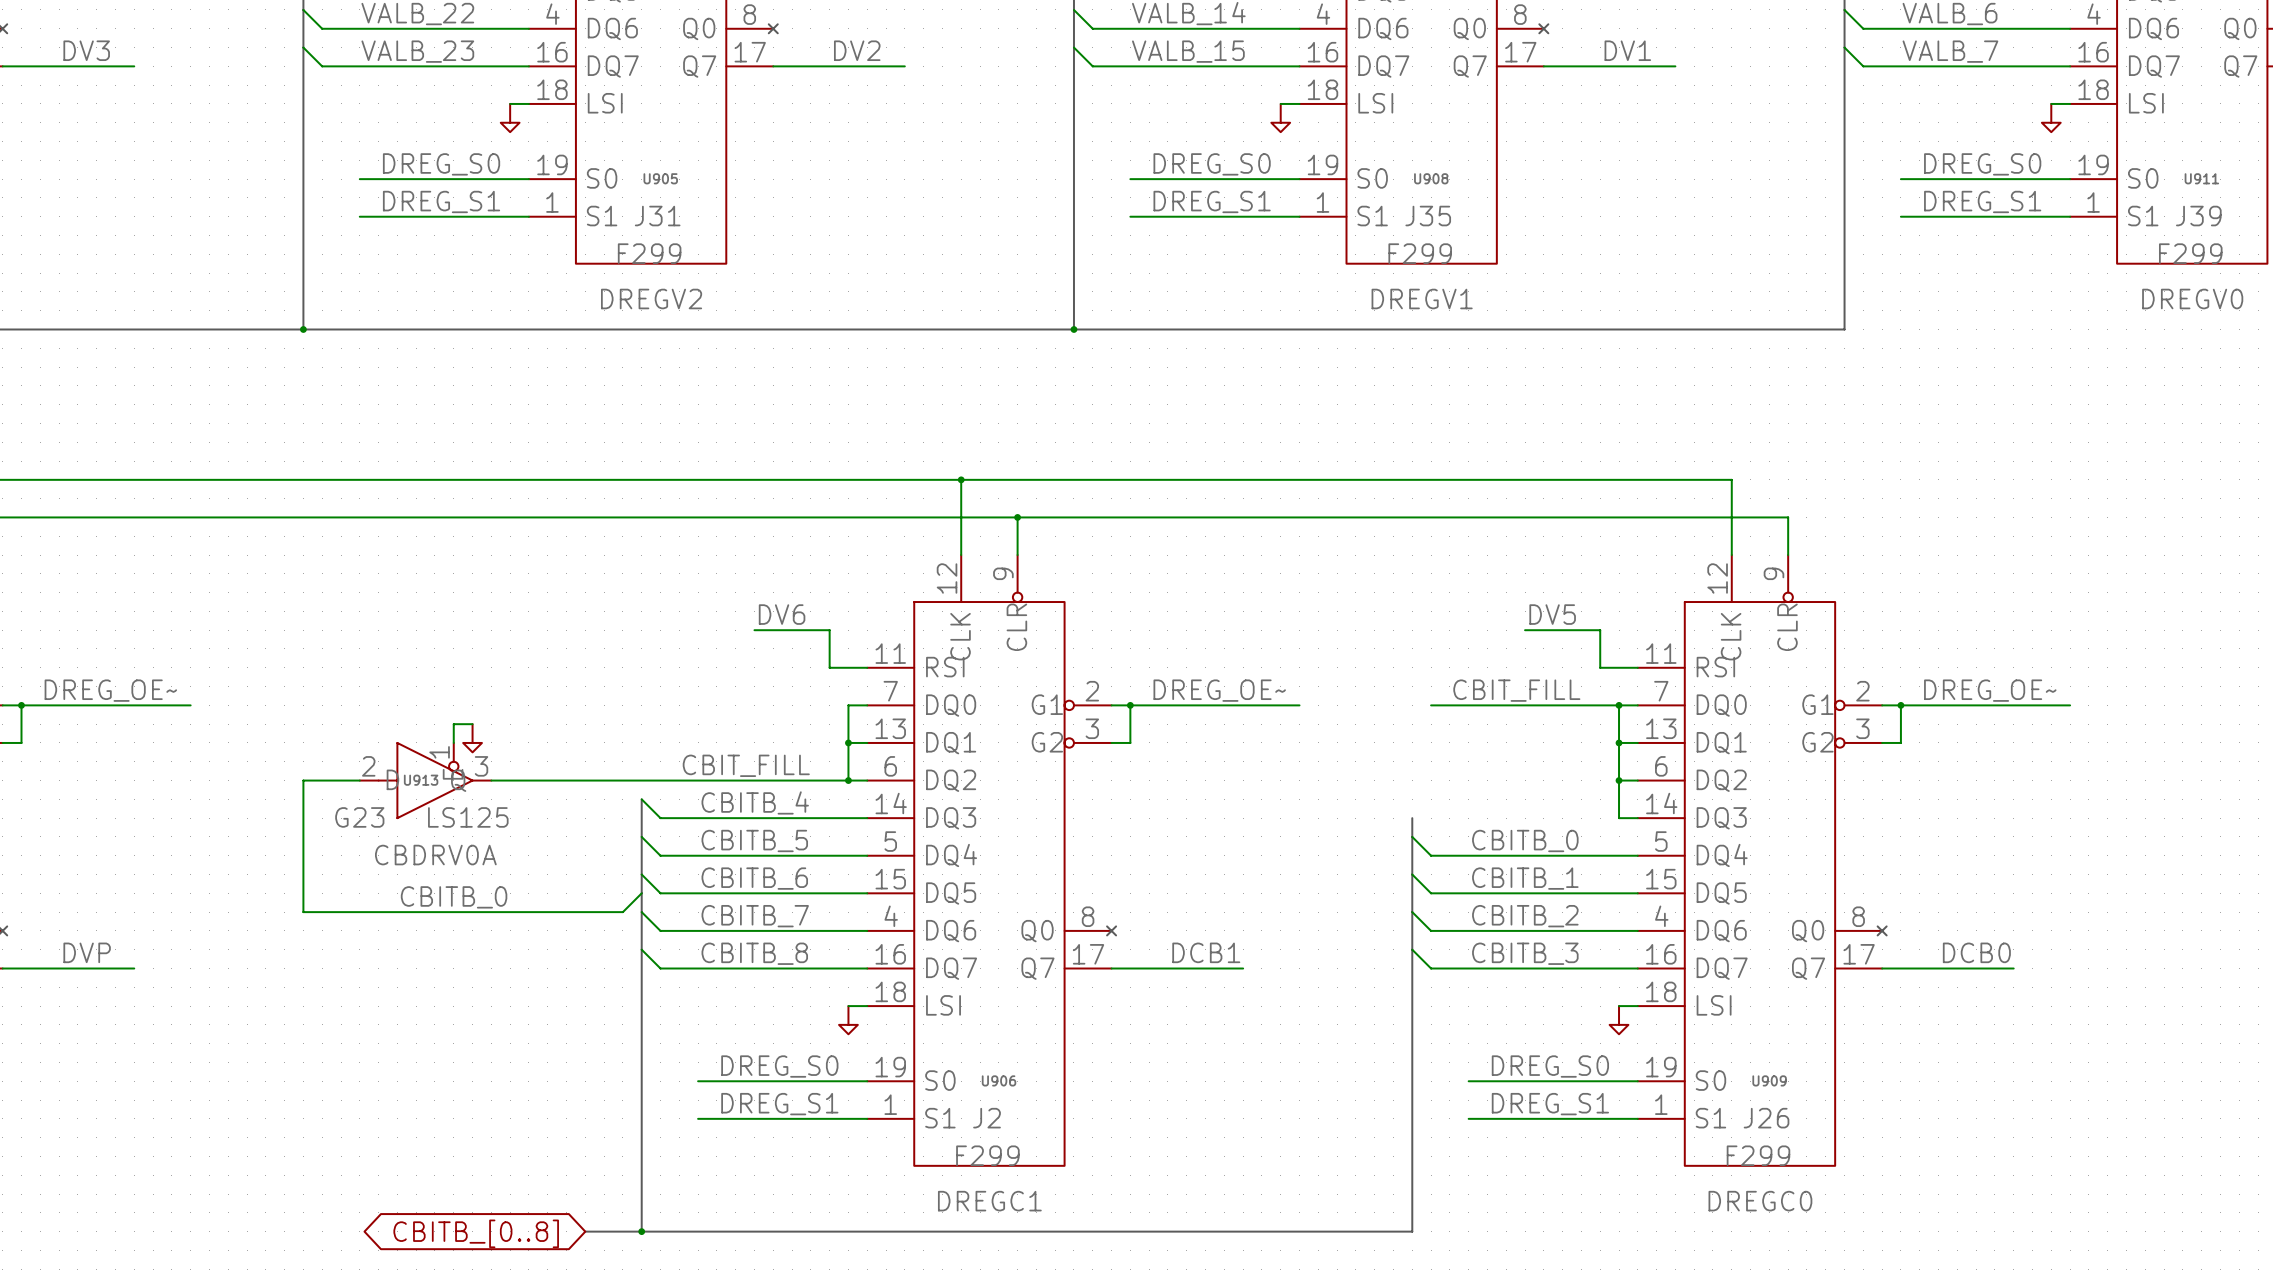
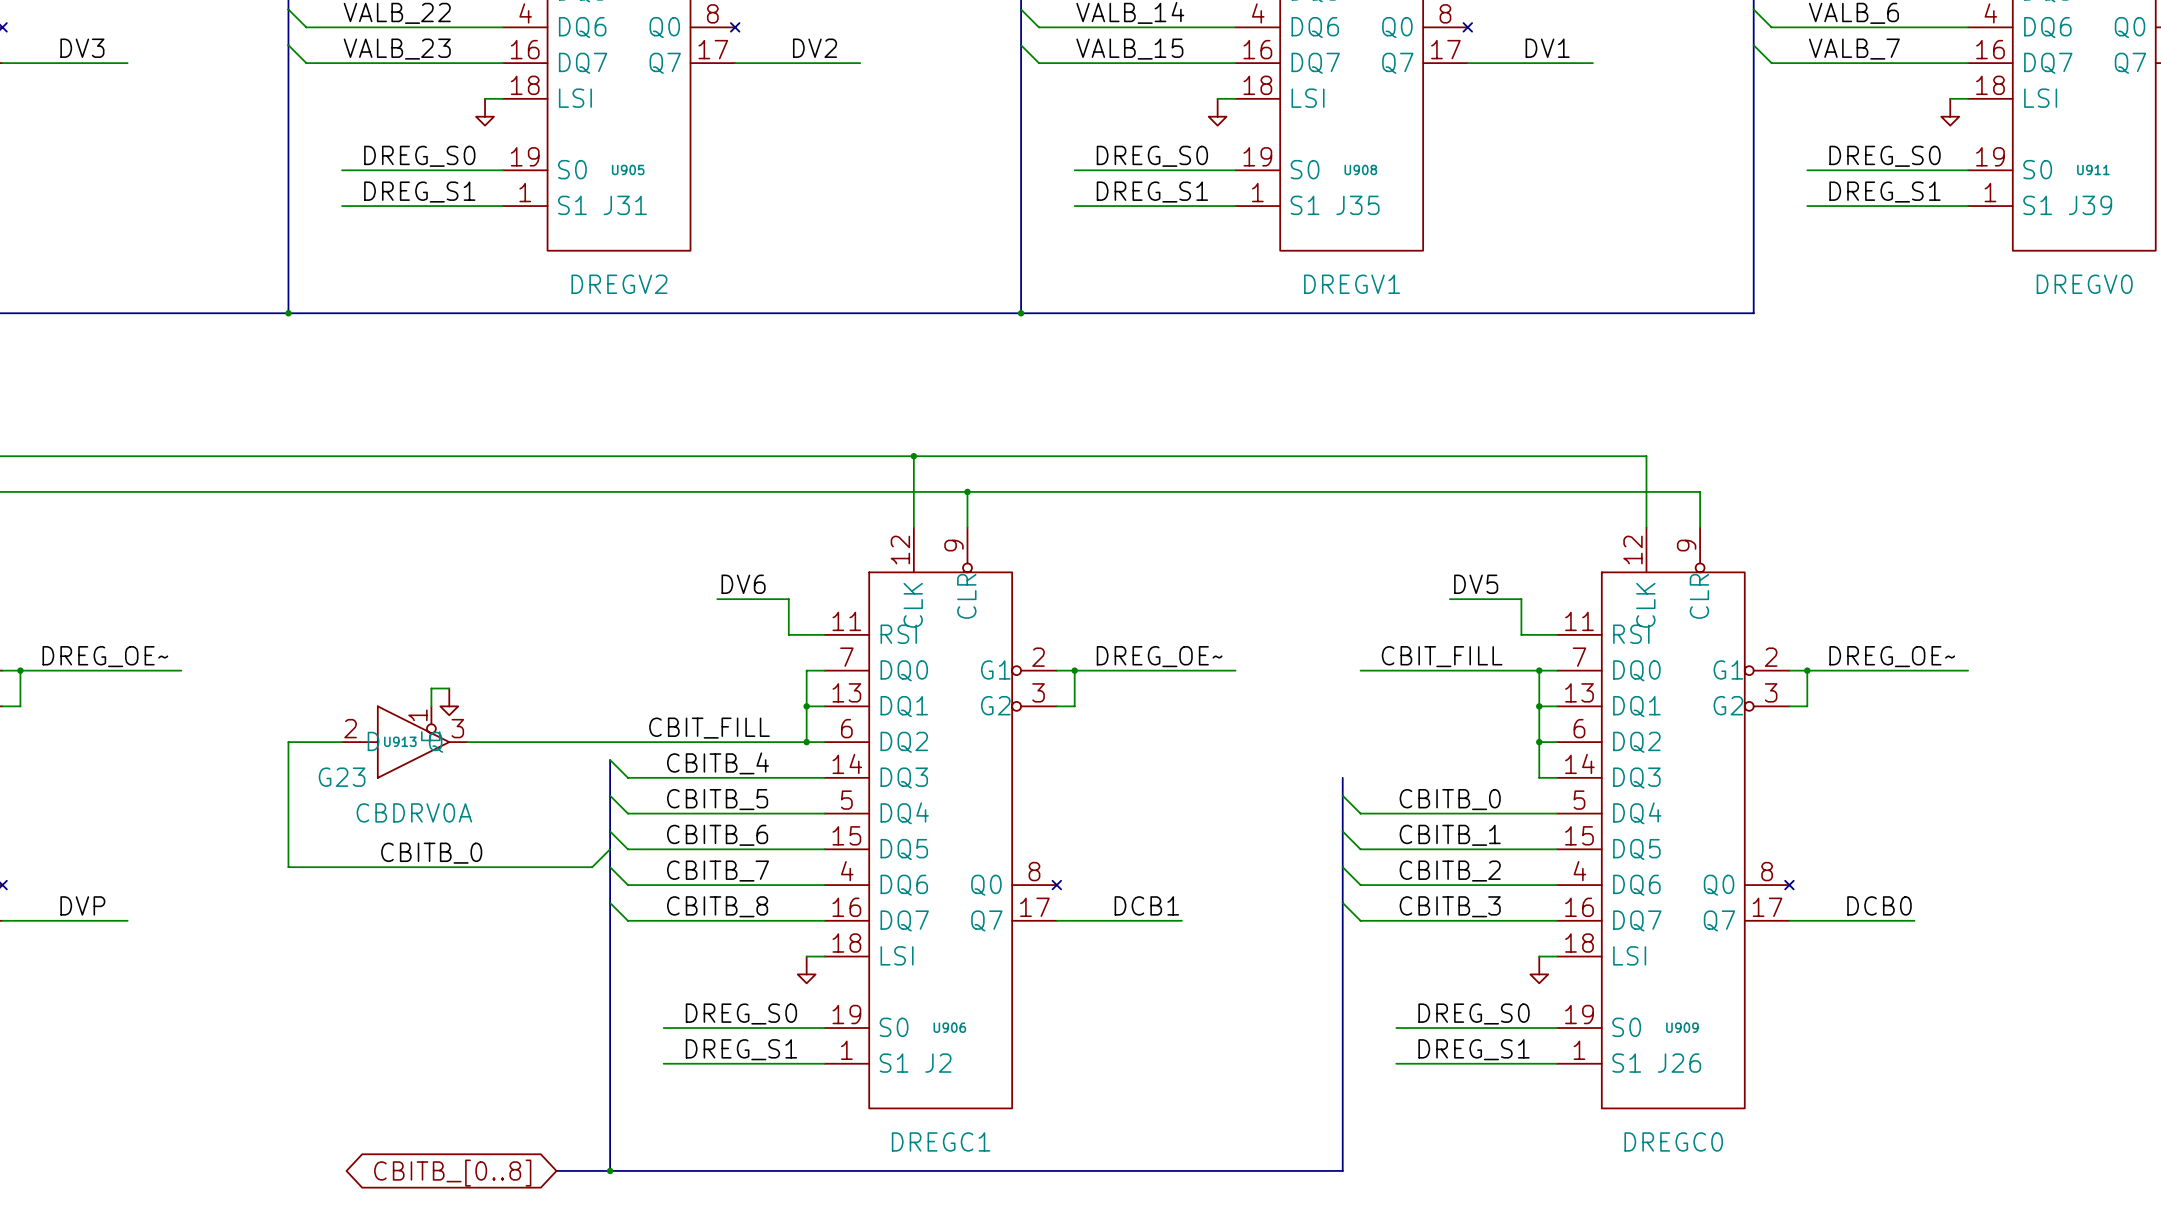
U905 value: F299 (649, 253) -> none
U908 value: F299 (1420, 253) -> none
U911 value: F299 (2190, 253) -> none
U913 value: LS125 (468, 817) -> none
U906 value: F299 (987, 1155) -> none
U909 value: F299 (1758, 1155) -> none

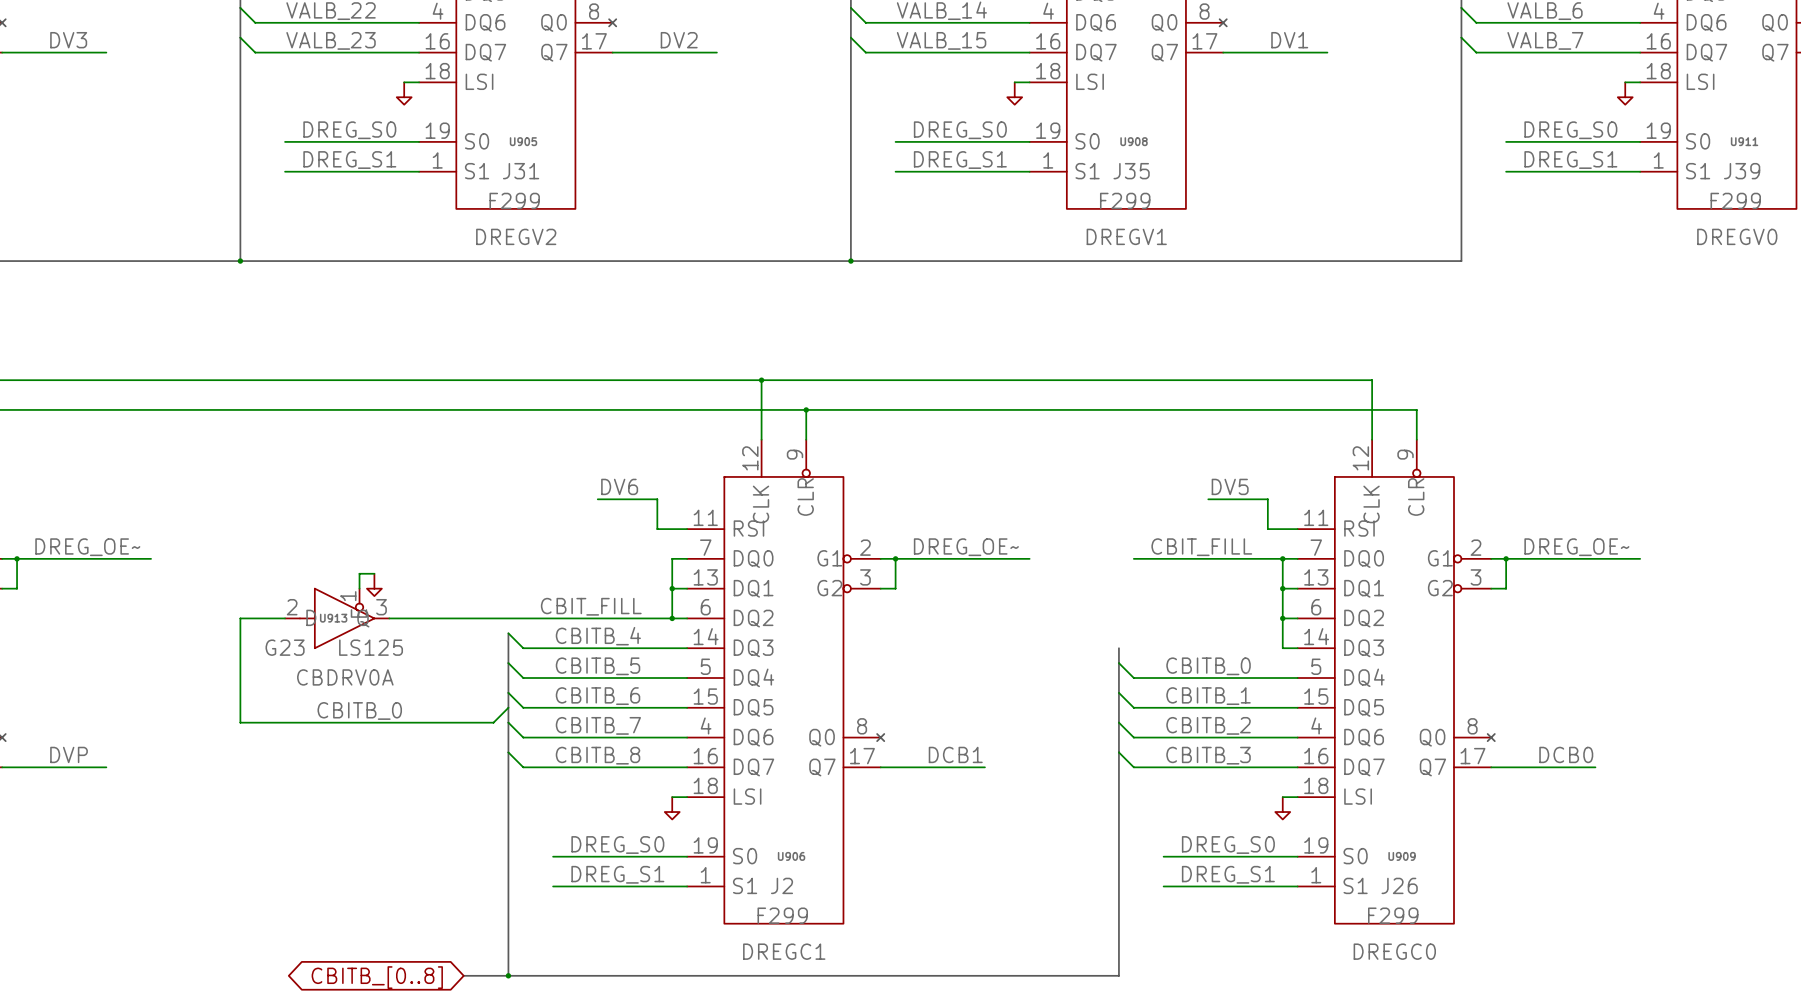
U905 value: none -> F299 (514, 200)
U908 value: none -> F299 (1125, 200)
U911 value: none -> F299 (1735, 200)
U913 value: none -> LS125 (371, 647)
U906 value: none -> F299 (782, 915)
U909 value: none -> F299 (1393, 915)

